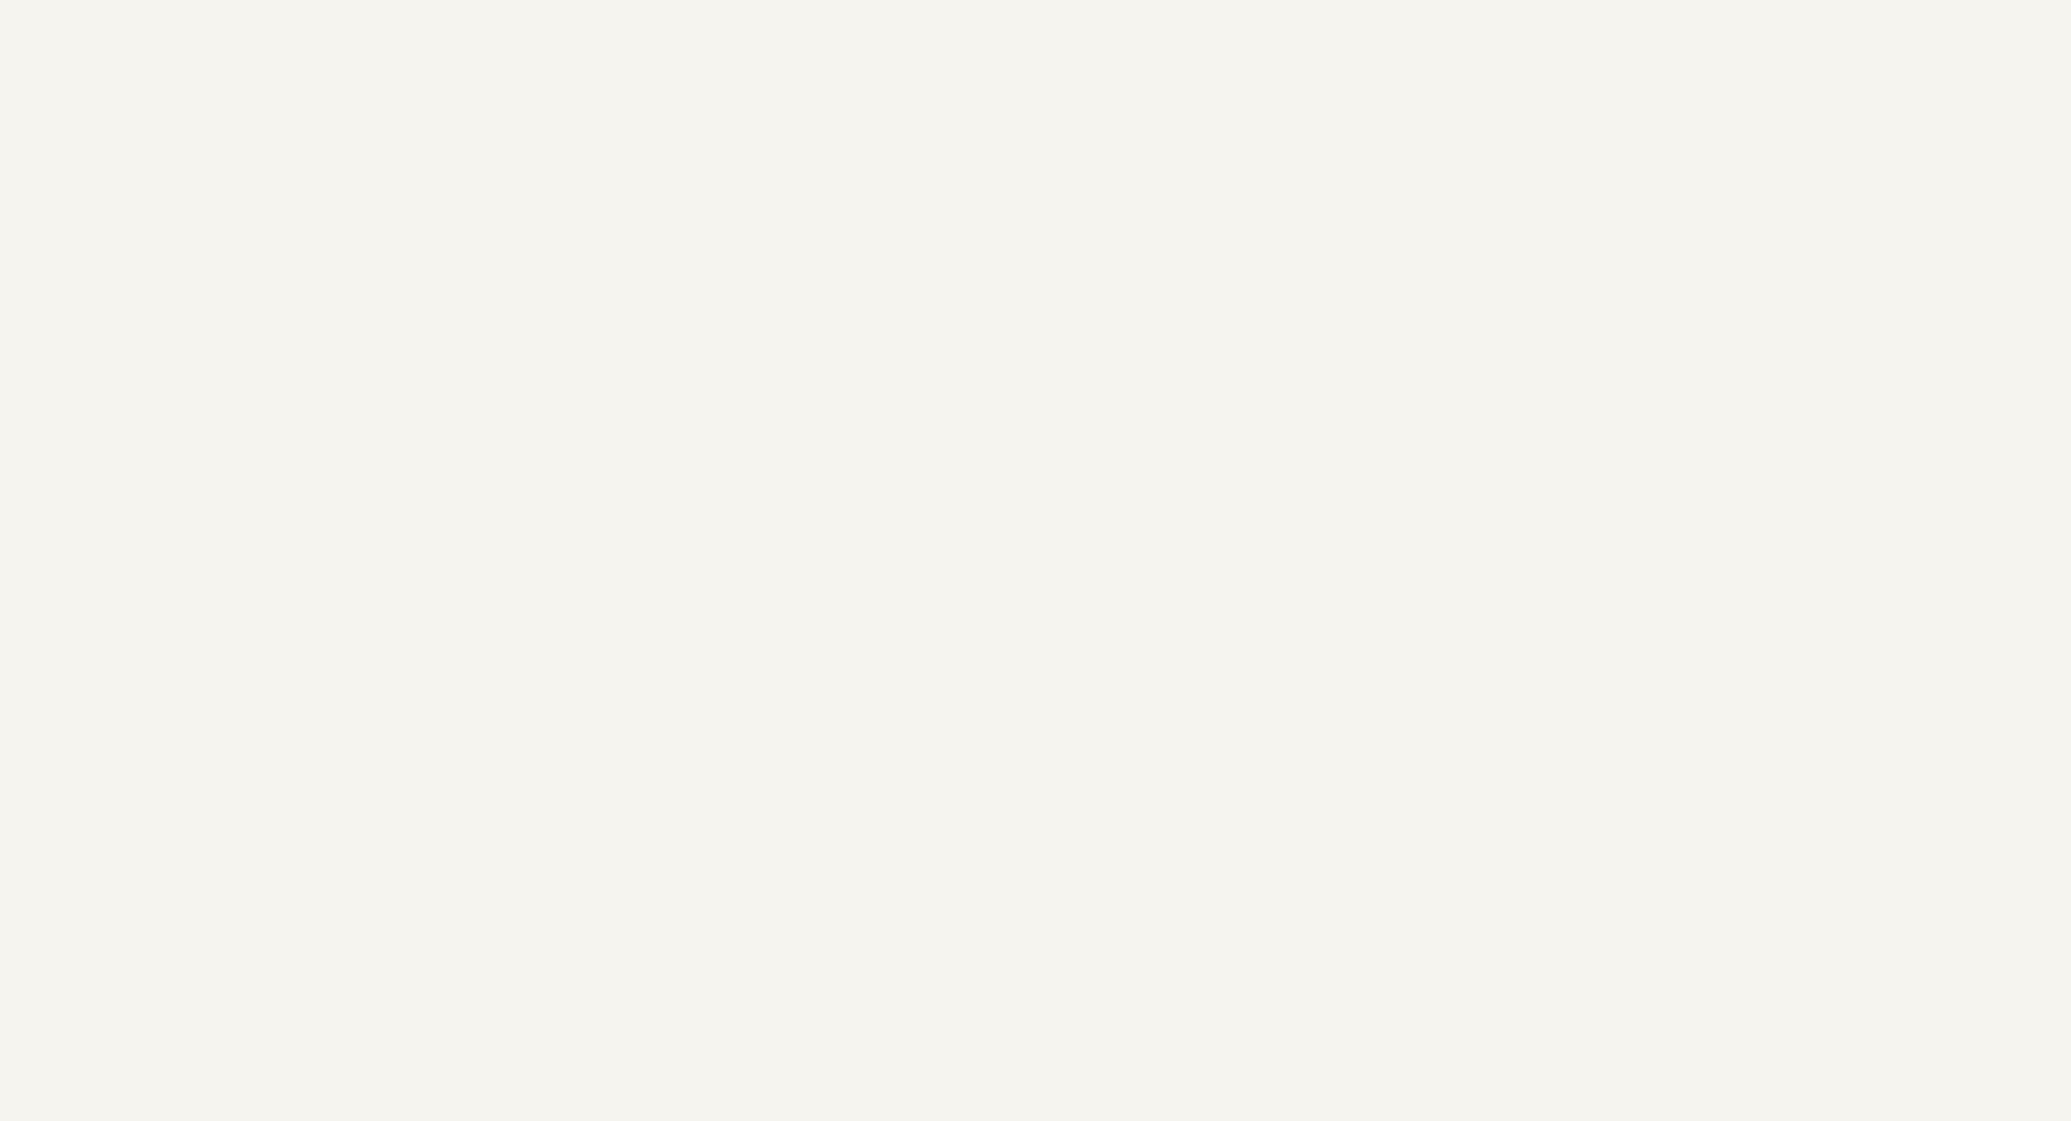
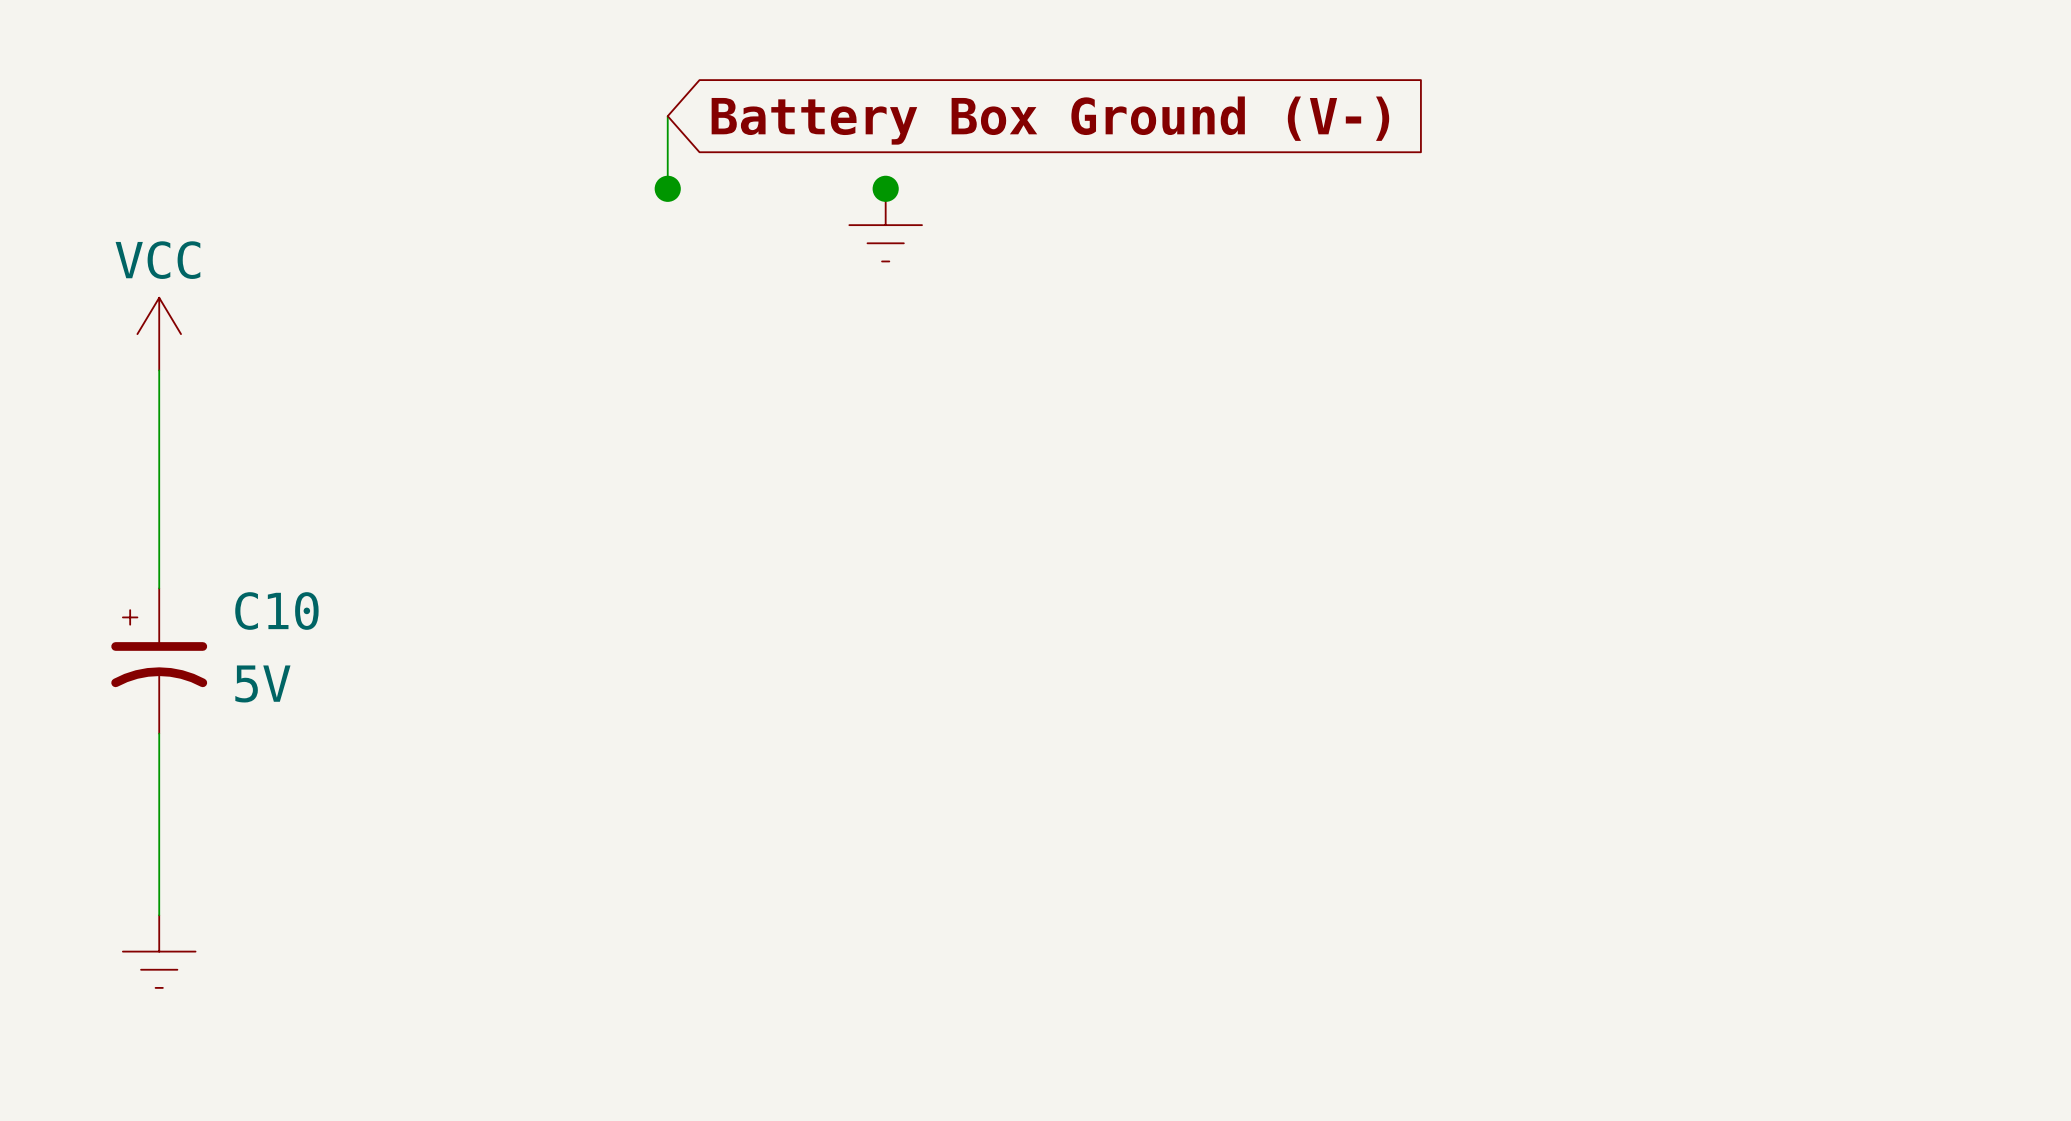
wire: none -> (667, 116) (667, 188)
global label: none -> Battery Box Ground (V-) (1050, 120)
junction: none -> (667, 188)
junction: none -> (885, 188)
power symbol: none -> (885, 225)
power symbol: none -> VCC (159, 334)
wire: none -> (159, 370) (159, 588)
C10: none -> 5V (159, 661)
wire: none -> (159, 733) (159, 915)
power symbol: none -> (159, 951)

